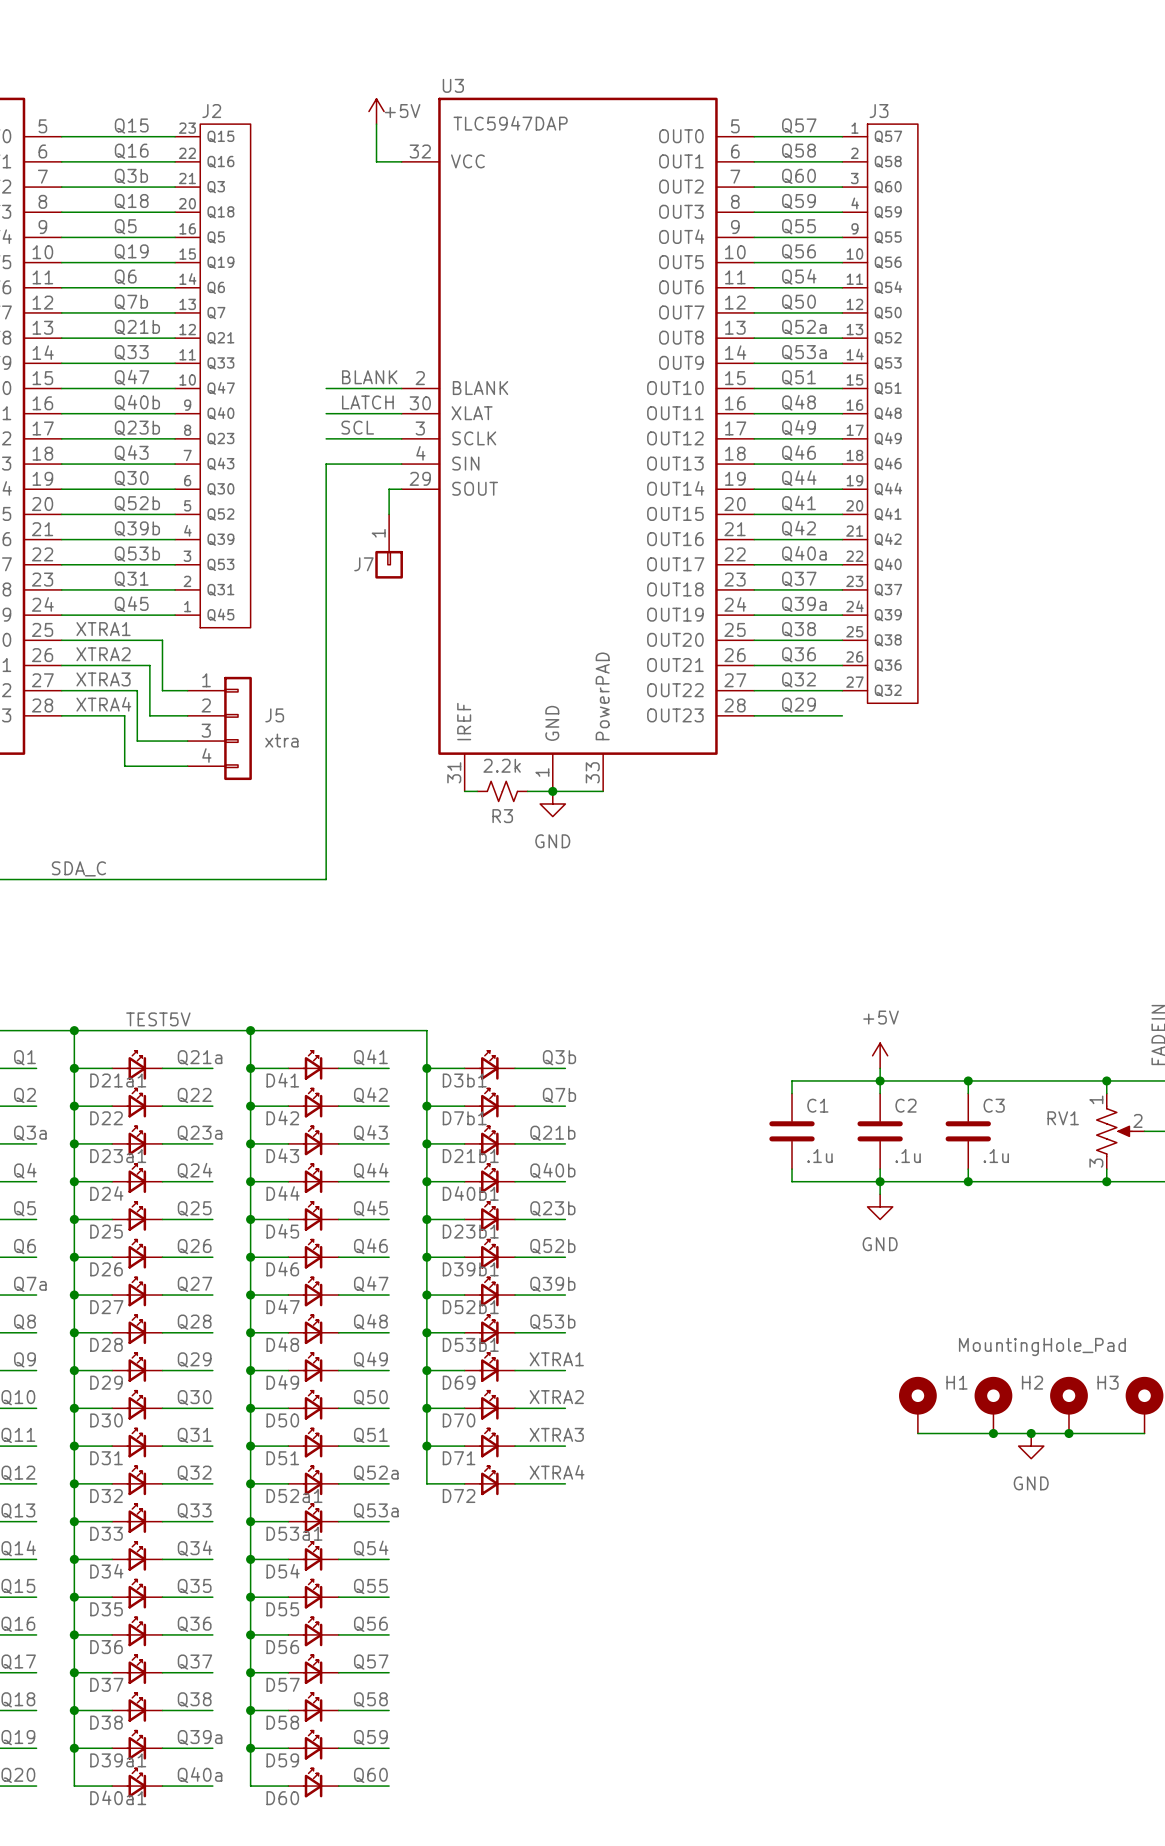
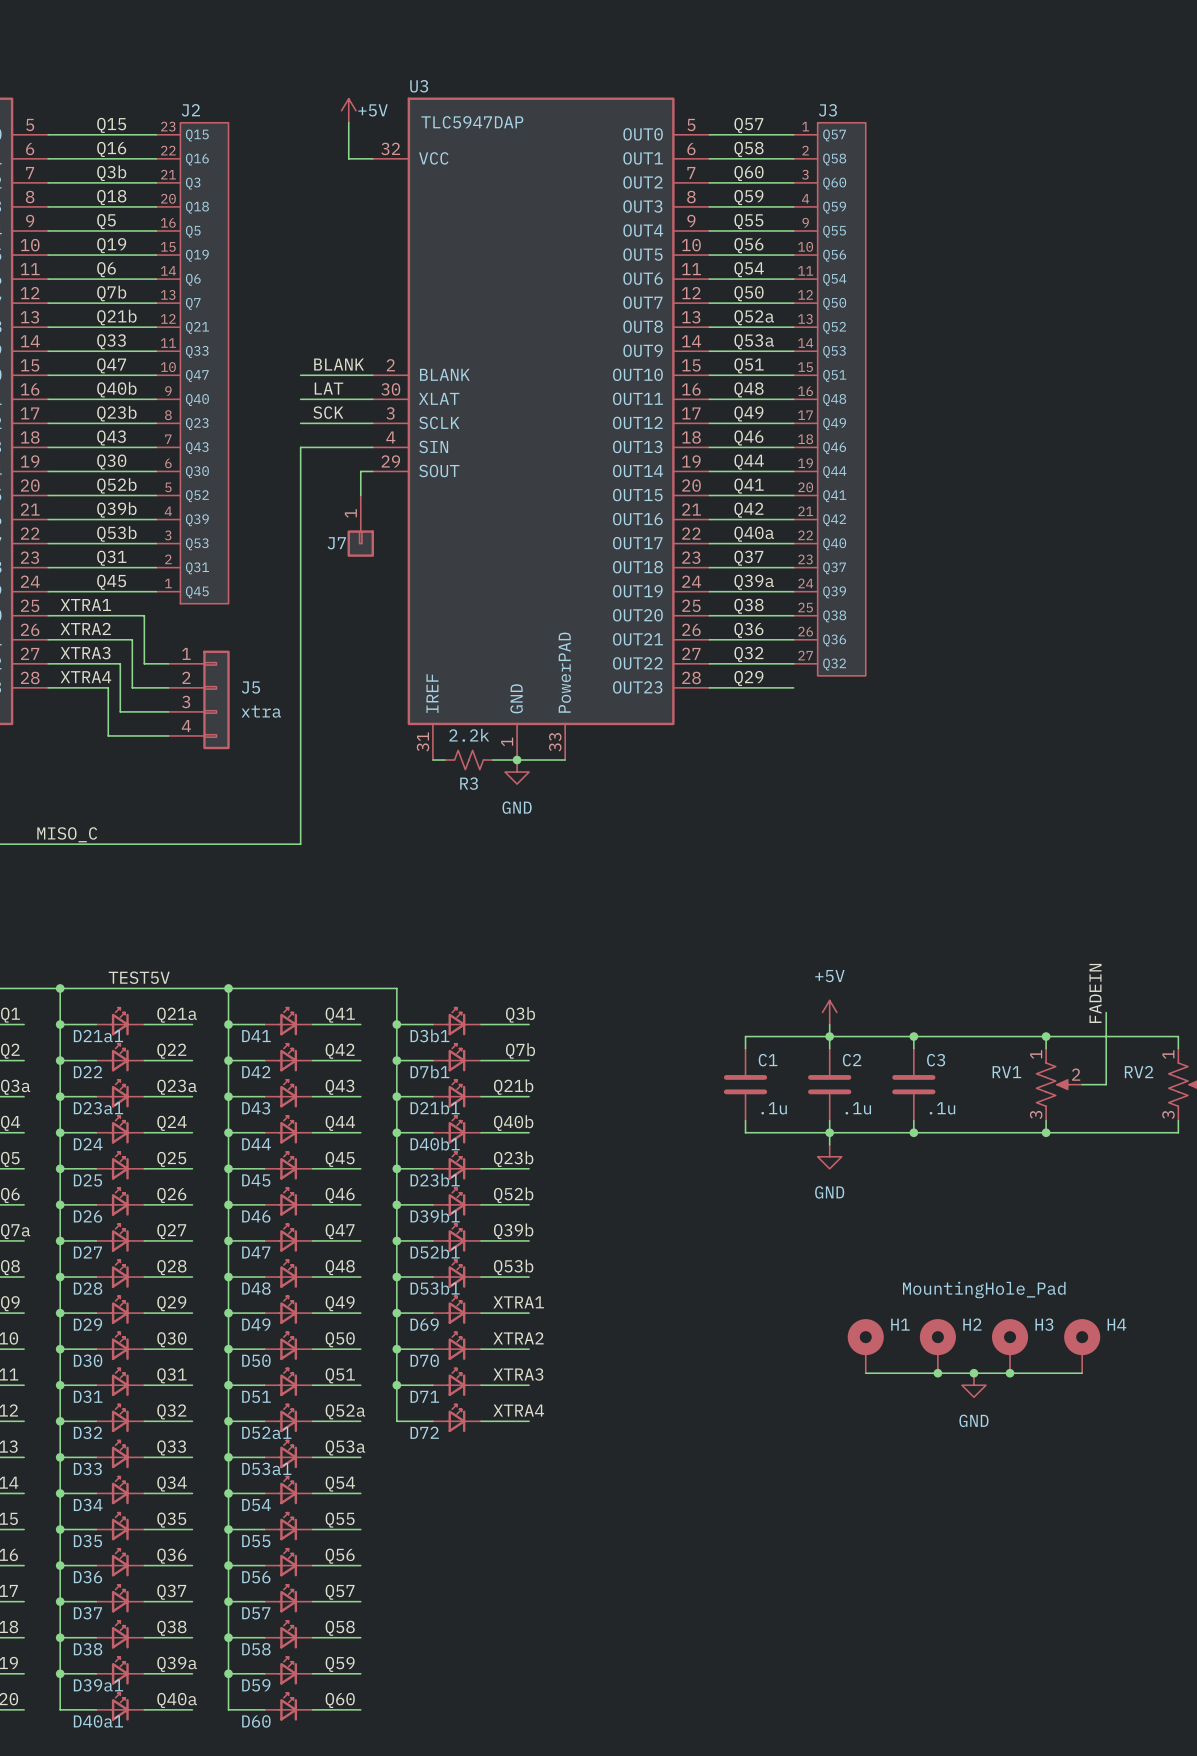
label: LATCH (367, 402) -> LAT (329, 388)
label: SCL (357, 427) -> SCK (328, 412)
label: SDA_C (78, 868) -> MISO_C (67, 834)

